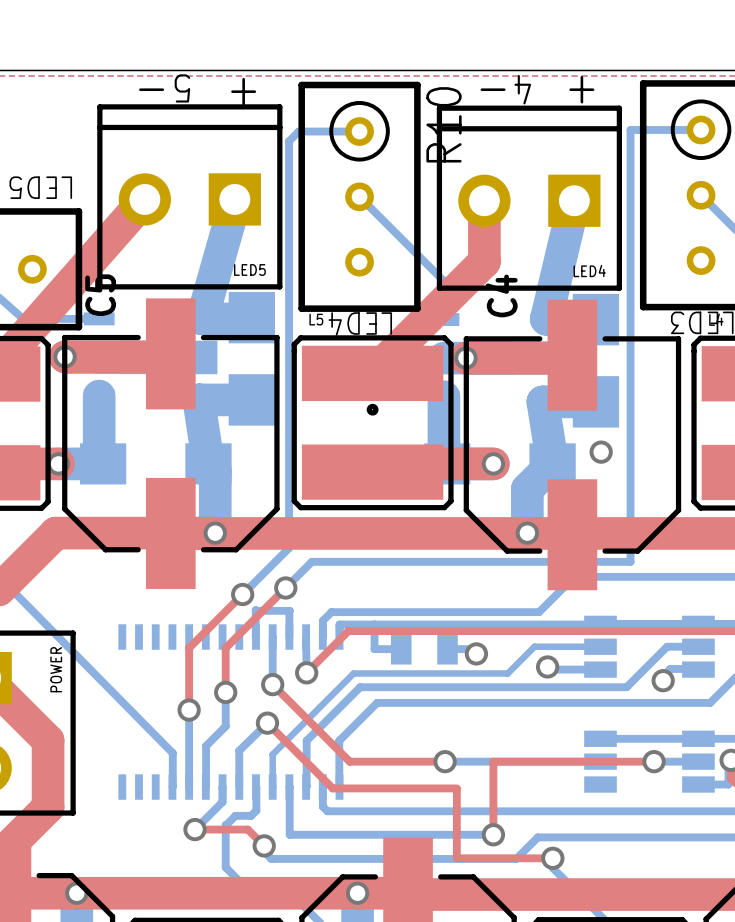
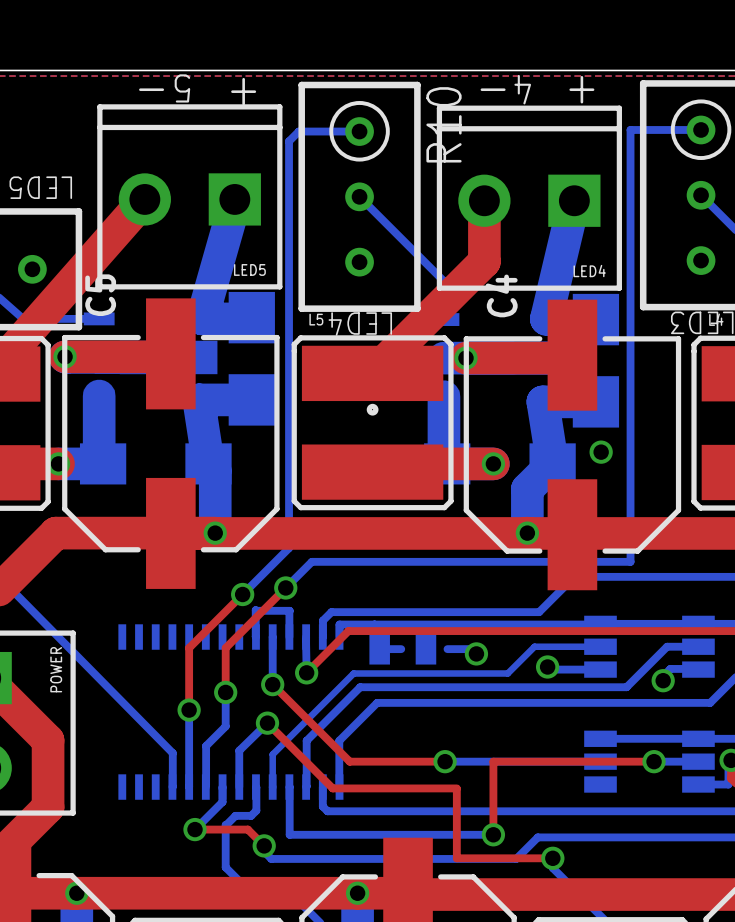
part position: (424, 649) -> (402, 649)

